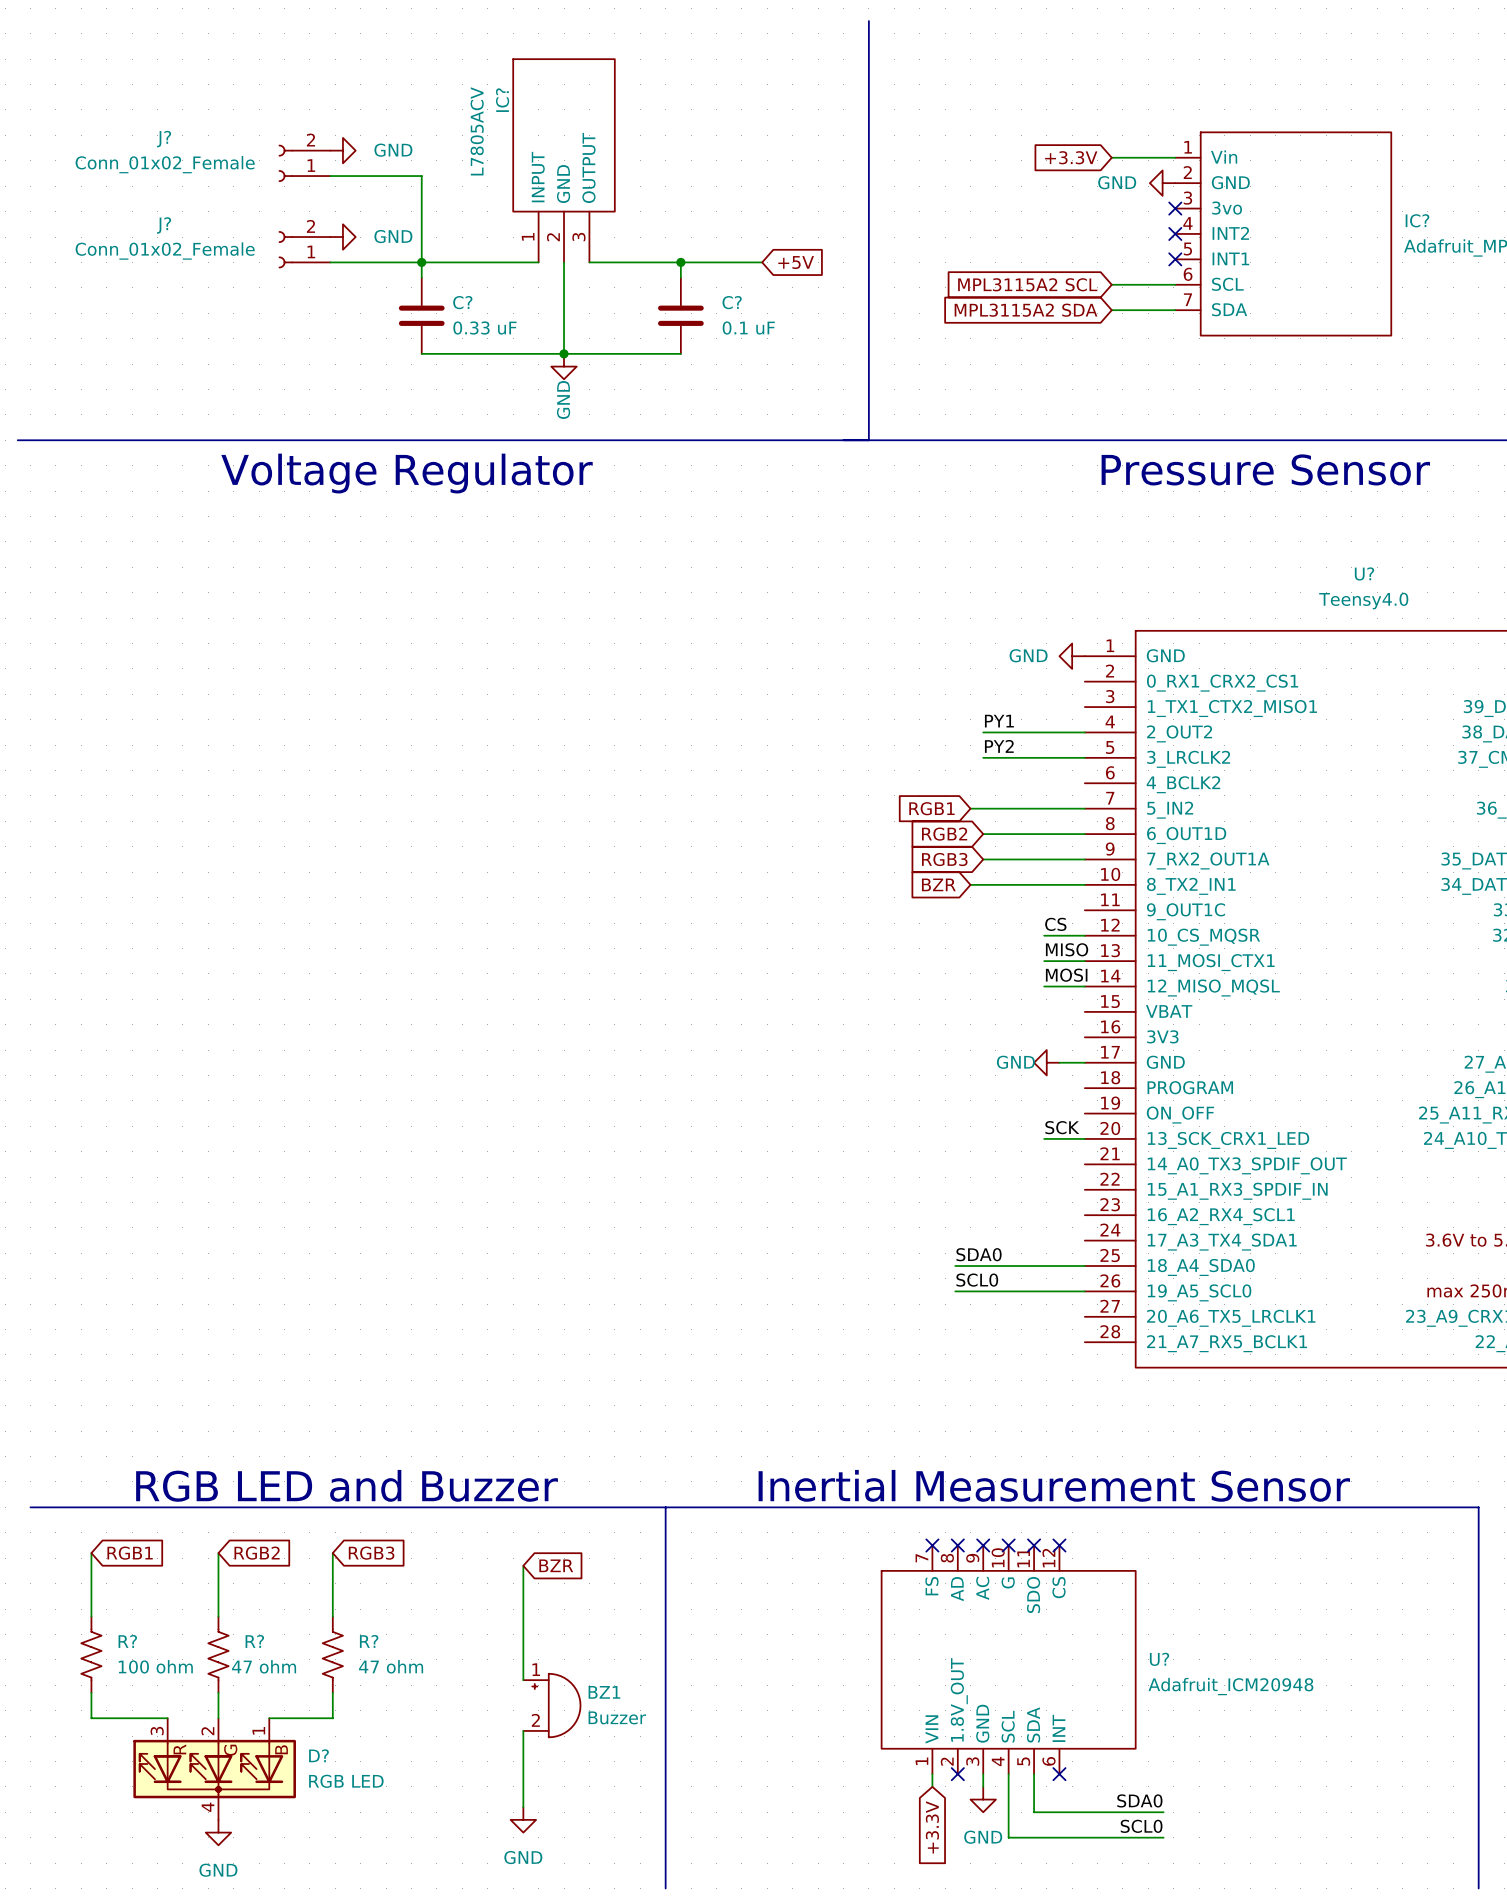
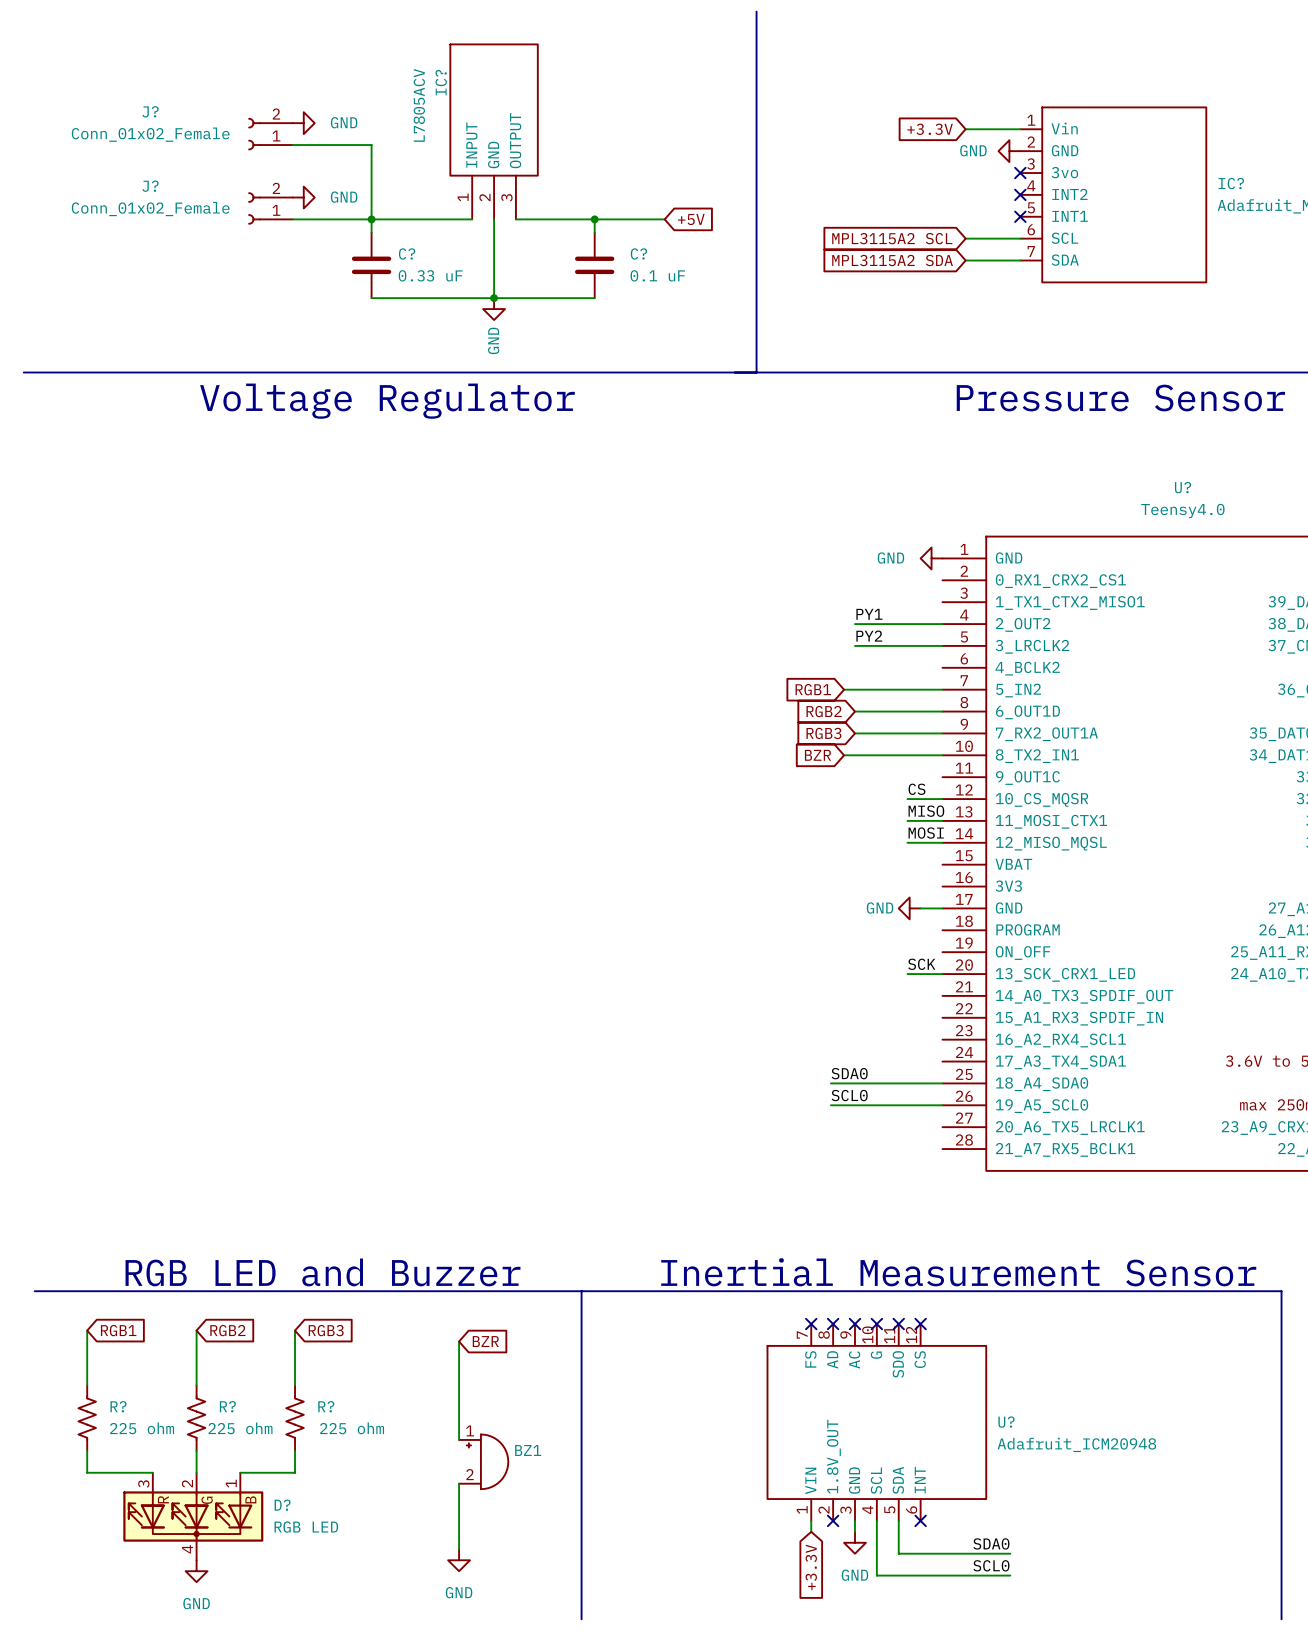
R? value: 100 ohm (155, 1666) -> 225 ohm (142, 1428)
R? value: 47 ohm (264, 1666) -> 225 ohm (240, 1428)
R? value: 47 ohm (391, 1666) -> 225 ohm (352, 1428)
BZ1 value: Buzzer (617, 1717) -> none

